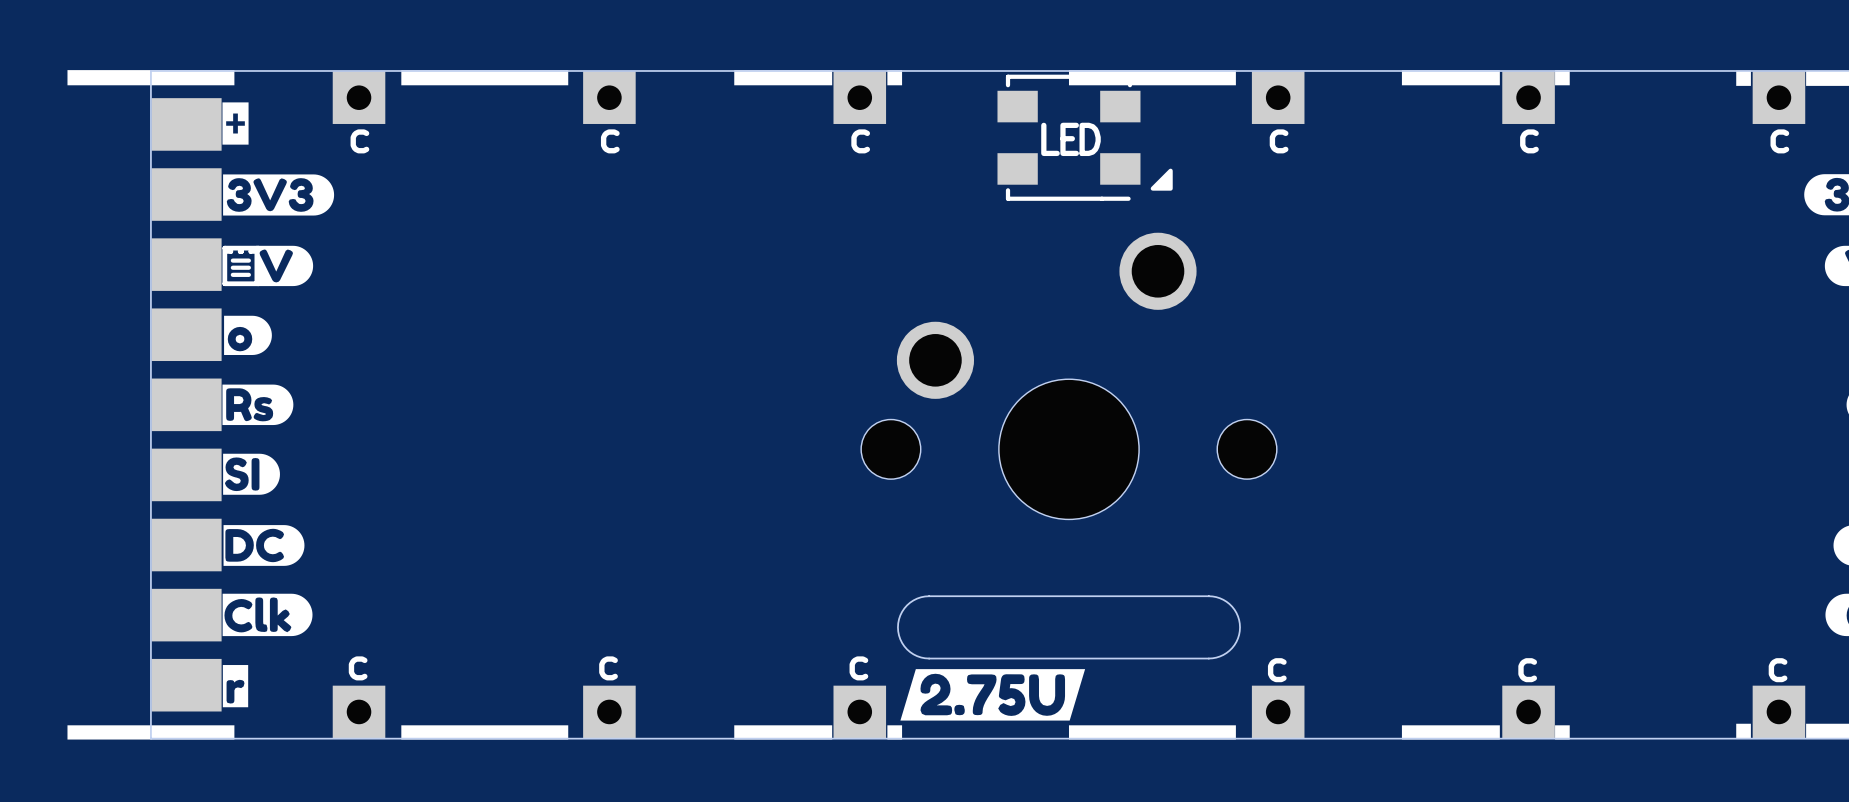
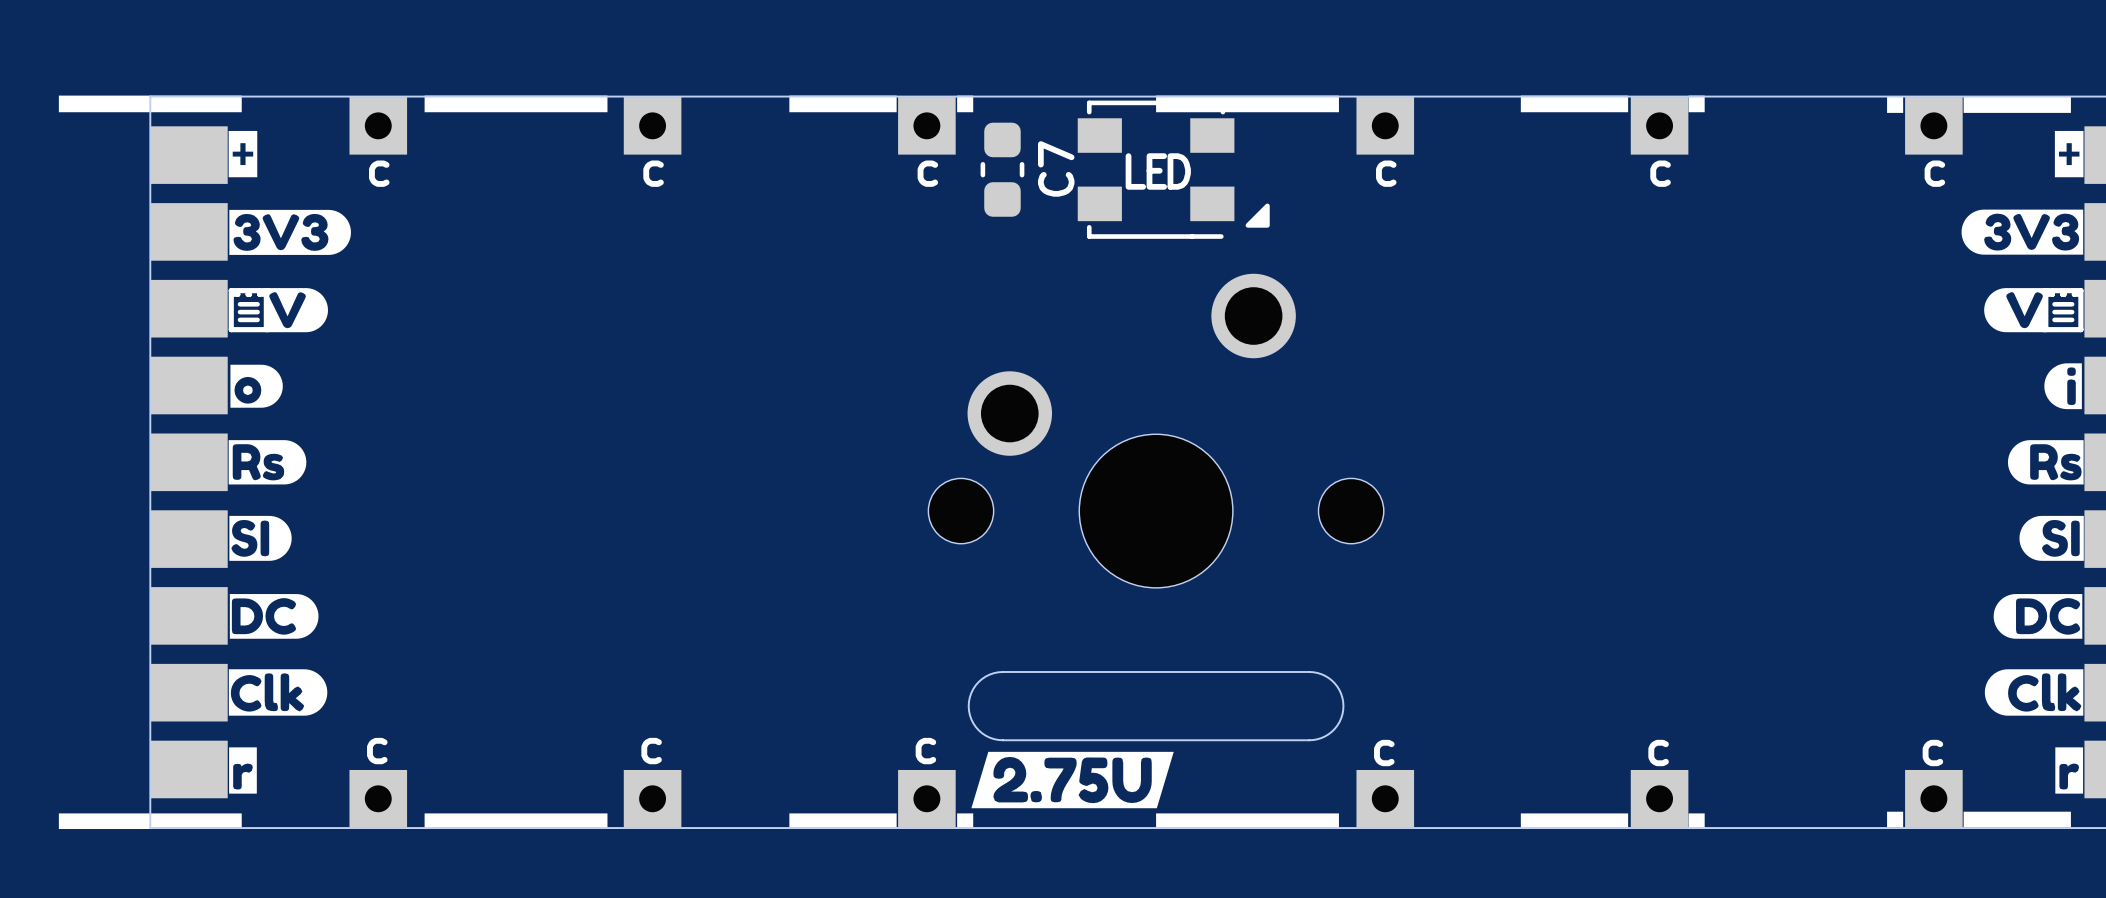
C7: none -> (1002, 169)

